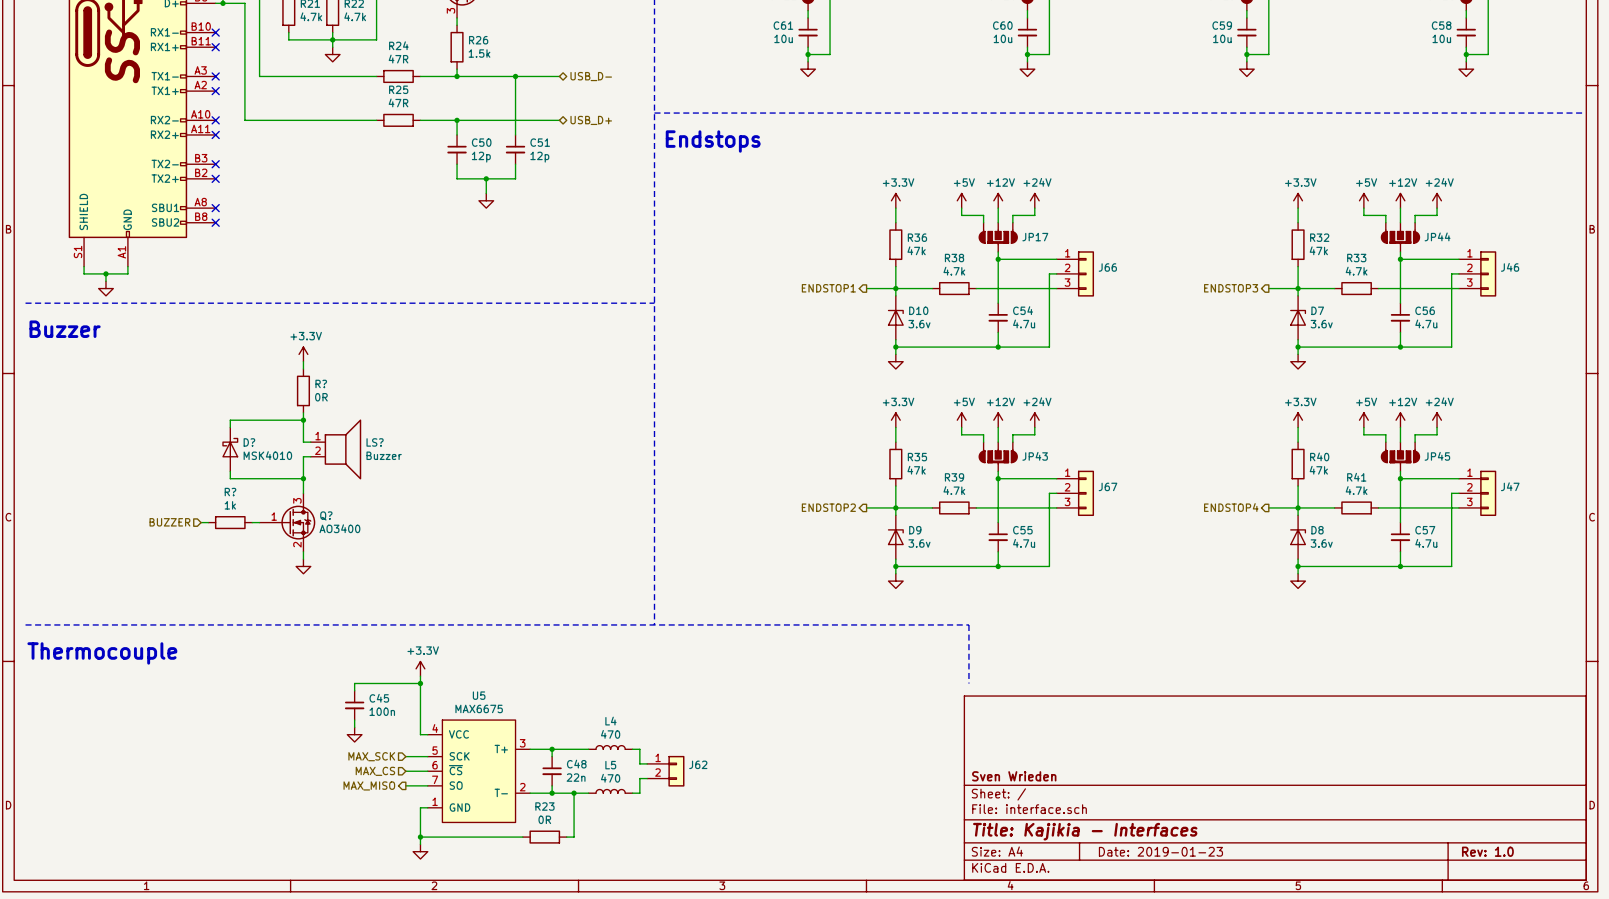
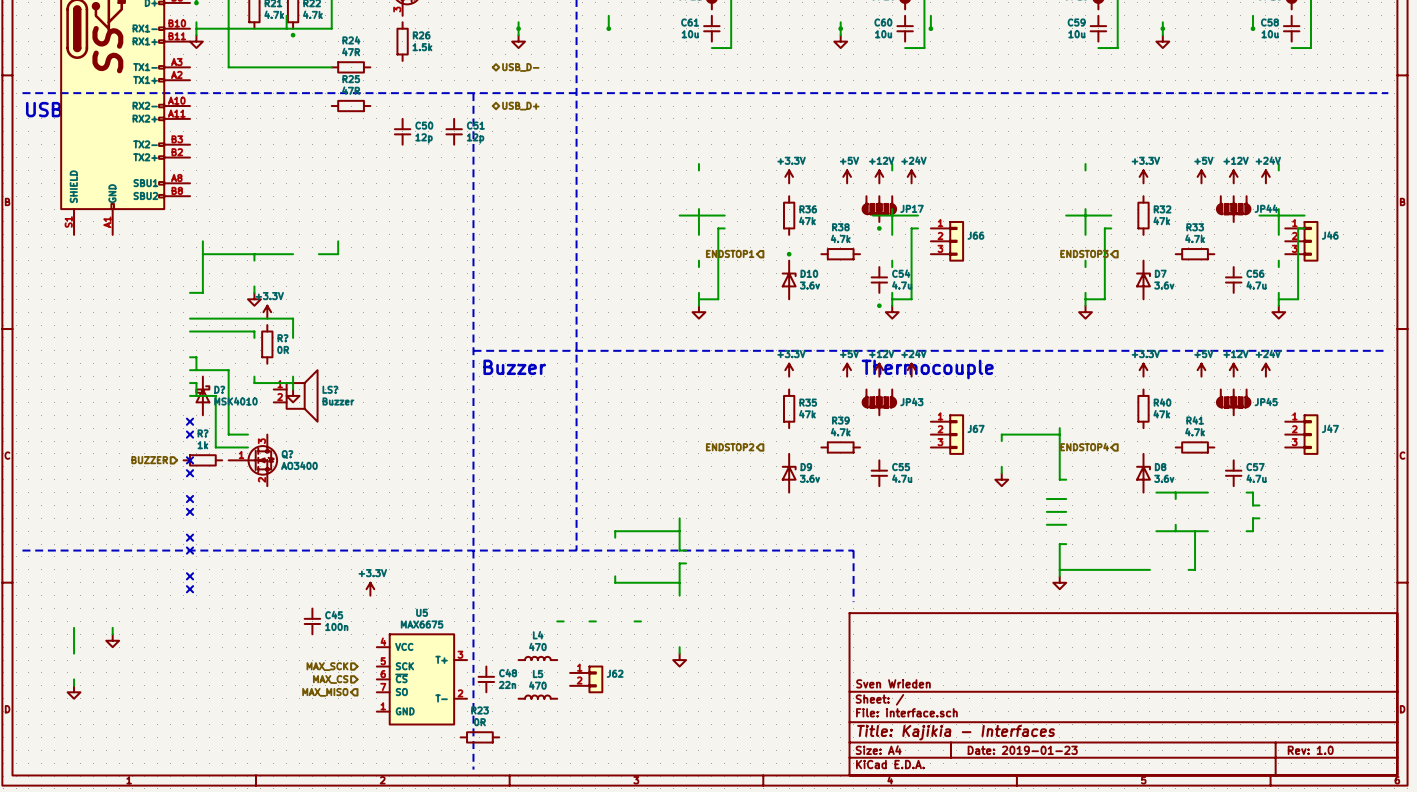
wire: (215, 3) (244, 3) (244, 120) (376, 120) -> none
wire: (808, 10) (808, 17) -> none
wire: (1027, 10) (1027, 17) -> none
wire: (1246, 10) (1246, 17) -> none
wire: (1466, 10) (1466, 17) -> none
wire: (457, 17) (457, 25) -> none
wire: none -> (196, 22) (196, 35)
wire: none -> (518, 22) (518, 35)
wire: none -> (840, 22) (840, 35)
no-connect mark: (215, 32) -> none
wire: (288, 32) (288, 39) (376, 39) (376, 32) -> (196, 28) (331, 28)
wire: (332, 32) (332, 47) -> (286, 15) (286, 28)
junction: none -> (518, 28)
junction: none -> (608, 28)
junction: none -> (840, 28)
junction: none -> (930, 28)
junction: none -> (1162, 28)
junction: none -> (1253, 28)
no-connect mark: (215, 47) -> none
power symbol: none -> (518, 41)
wire: (808, 47) (808, 61) -> (608, 15) (608, 28)
power symbol: none -> (840, 41)
wire: (1027, 47) (1027, 61) -> (930, 15) (930, 28)
wire: (1246, 47) (1246, 61) -> (1162, 22) (1162, 35)
power symbol: none -> (1162, 41)
wire: (1466, 47) (1466, 61) -> (1253, 15) (1253, 28)
power symbol position: (332, 54) -> (196, 41)
junction: (808, 54) -> none
junction: (1027, 54) -> none
junction: (1246, 54) -> none
junction: (1466, 54) -> none
wire: (457, 69) (457, 76) -> none
power symbol: (808, 69) -> none
power symbol: (1027, 69) -> none
power symbol: (1246, 69) -> none
power symbol: (1466, 69) -> none
no-connect mark: (215, 76) -> none
wire: (420, 76) (559, 76) -> none
junction: (457, 76) -> none
wire: (515, 76) (515, 134) -> none
junction: (515, 76) -> none
no-connect mark: (215, 91) -> none
line: none -> (22, 93) (1388, 93)
line: none -> (473, 93) (473, 769)
line: (654, 113) (1583, 113) -> none
no-connect mark: (215, 120) -> none
wire: (420, 120) (559, 120) -> none
wire: (457, 120) (457, 134) -> none
junction: (457, 120) -> none
text: none -> USB (43, 109)
no-connect mark: (215, 134) -> none
text: Endstops (713, 141) -> none
no-connect mark: (215, 164) -> none
wire: (457, 164) (457, 178) (515, 178) (515, 164) -> none
no-connect mark: (215, 178) -> none
wire: (486, 178) (486, 193) -> none
junction: (486, 178) -> none
wire: none -> (698, 164) (698, 170)
wire: none -> (892, 164) (892, 170)
wire: none -> (1085, 164) (1085, 170)
wire: none -> (1278, 164) (1278, 170)
power symbol: (486, 200) -> none
no-connect mark: (215, 208) -> none
wire: (895, 208) (895, 222) -> none
wire: (961, 208) (961, 215) (983, 215) (983, 222) -> none
wire: (998, 208) (998, 222) -> none
wire: (1034, 208) (1034, 215) (1012, 215) (1012, 222) -> none
wire: (1298, 208) (1298, 222) -> none
wire: (1363, 208) (1363, 215) (1385, 215) (1385, 222) -> none
wire: (1400, 208) (1400, 222) -> none
wire: (1437, 208) (1437, 215) (1415, 215) (1415, 222) -> none
no-connect mark: (215, 222) -> none
wire: none -> (892, 209) (892, 234)
wire: none -> (679, 215) (724, 215)
wire: none -> (872, 215) (918, 215)
wire: none -> (1066, 215) (1111, 215)
wire: none -> (1259, 215) (1304, 215)
wire: (998, 251) (998, 303) -> none
wire: (1400, 251) (1400, 303) -> none
wire: none -> (724, 228) (718, 228) (718, 299) (698, 299)
wire: (998, 259) (1034, 259) -> (892, 299) (911, 299) (911, 228)
wire: (1042, 259) (1056, 259) -> none
wire: none -> (1111, 228) (1104, 228) (1104, 299) (1085, 299)
wire: (1400, 259) (1458, 259) -> none
junction: (1400, 259) -> none
wire: none -> (1304, 228) (1298, 228) (1298, 299) (1278, 299)
wire: (84, 266) (84, 273) (127, 273) (127, 266) -> none
wire: (895, 266) (895, 295) -> (698, 209) (698, 234)
wire: (1298, 266) (1298, 295) -> (1085, 209) (1085, 234)
wire: (105, 273) (105, 281) -> none
junction: (105, 273) -> none
wire: none -> (202, 241) (202, 292) (190, 292)
wire: none -> (338, 241) (338, 254) (318, 254)
wire: (1056, 273) (1049, 273) (1049, 347) (895, 347) -> none
wire: (1458, 273) (1451, 273) (1451, 295) -> none
power symbol: (105, 288) -> none
wire: none -> (202, 254) (293, 254)
wire: none -> (254, 254) (254, 260)
wire: (866, 288) (932, 288) -> none
wire: (976, 288) (1056, 288) -> none
wire: (1268, 288) (1334, 288) -> none
junction: (1298, 288) -> none
wire: (1378, 288) (1458, 288) -> none
wire: none -> (698, 260) (698, 267)
wire: none -> (892, 260) (892, 267)
wire: none -> (1085, 260) (1085, 267)
line: (25, 303) (654, 303) -> none
wire: (1451, 303) (1451, 332) -> (1278, 209) (1278, 234)
text: Buzzer (65, 329) -> none
wire: (998, 332) (998, 347) -> (892, 292) (892, 305)
wire: (1400, 332) (1400, 347) -> none
power symbol: none -> (254, 299)
wire: (895, 339) (895, 354) -> (698, 292) (698, 305)
wire: (1298, 339) (1298, 354) -> (1085, 292) (1085, 305)
junction: (895, 347) -> none
wire: (1298, 347) (1451, 347) -> none
junction: (1298, 347) -> none
junction: (1400, 347) -> none
power symbol: none -> (698, 312)
power symbol: none -> (892, 312)
power symbol: none -> (1278, 312)
wire: none -> (190, 318) (293, 318) (293, 337)
wire: (303, 361) (303, 369) -> (254, 286) (254, 292)
power symbol: (895, 361) -> none
power symbol position: (1298, 361) -> (1085, 312)
wire: none -> (190, 331) (254, 331) (254, 337)
line: none -> (473, 350) (1388, 350)
wire: none -> (190, 357) (196, 357) (196, 370)
wire: (303, 412) (303, 442) (310, 442) -> none
text: none -> Buzzer (514, 367)
text: none -> Thermocouple (927, 369)
wire: (230, 420) (230, 427) -> (202, 370) (190, 370)
wire: (259, 420) (303, 420) -> (228, 370) (228, 434) (247, 434)
junction: (303, 420) -> none
wire: none -> (254, 376) (254, 383) (293, 383)
wire: none -> (293, 376) (293, 389)
wire: (895, 427) (895, 442) -> none
wire: (961, 427) (961, 434) (983, 434) (983, 442) -> none
wire: (998, 427) (998, 442) -> none
wire: (1034, 427) (1034, 434) (1012, 434) (1012, 442) -> none
wire: (1298, 427) (1298, 442) -> none
wire: (1363, 427) (1363, 434) (1385, 434) (1385, 442) -> none
wire: (1400, 427) (1400, 442) -> none
wire: (1437, 427) (1437, 434) (1415, 434) (1415, 442) -> none
wire: none -> (190, 383) (196, 383) (196, 395)
wire: none -> (190, 395) (215, 395) (215, 447) (247, 447)
power symbol: none -> (293, 395)
wire: (310, 456) (303, 456) (303, 493) -> none
wire: (230, 471) (230, 478) (303, 478) -> none
wire: (998, 471) (998, 522) -> none
wire: (1400, 471) (1400, 522) -> none
no-connect mark: none -> (190, 421)
junction: (303, 478) -> none
wire: (998, 478) (1056, 478) -> none
junction: (998, 478) -> none
wire: (1400, 478) (1458, 478) -> (1156, 492) (1207, 492)
junction: (1400, 478) -> none
wire: (895, 486) (895, 515) -> none
wire: none -> (1059, 428) (1059, 479) (1066, 479)
wire: (1298, 486) (1298, 515) -> none
no-connect mark: none -> (190, 434)
wire: (1056, 493) (1049, 493) (1049, 566) (895, 566) -> none
wire: none -> (1059, 434) (1001, 434) (1001, 441)
wire: (1458, 493) (1451, 493) (1451, 566) (1298, 566) -> none
wire: (866, 507) (932, 507) -> none
junction: (895, 507) -> none
wire: (976, 507) (1056, 507) -> none
wire: (1268, 507) (1334, 507) -> none
junction: (1298, 507) -> none
wire: (1378, 507) (1458, 507) -> none
wire: (201, 522) (208, 522) -> none
no-connect mark: none -> (190, 460)
wire: (252, 522) (259, 522) -> none
wire: none -> (1001, 466) (1001, 473)
no-connect mark: none -> (190, 473)
power symbol: none -> (1001, 479)
wire: (303, 551) (303, 559) -> none
wire: (998, 551) (998, 566) -> none
wire: (1400, 551) (1400, 566) -> none
wire: (895, 559) (895, 573) -> none
wire: (1298, 559) (1298, 573) -> none
wire: none -> (1175, 492) (1175, 499)
wire: none -> (1246, 492) (1253, 492) (1253, 505) (1259, 505)
no-connect mark: none -> (190, 499)
power symbol: (303, 566) -> none
junction: (895, 566) -> none
junction: (998, 566) -> none
wire: none -> (1046, 499) (1066, 499)
junction: (1298, 566) -> none
junction: (1400, 566) -> none
no-connect mark: none -> (190, 511)
power symbol: (895, 581) -> none
wire: none -> (1046, 511) (1066, 511)
power symbol: (1298, 581) -> none
wire: none -> (679, 518) (679, 550) (686, 550)
wire: none -> (1259, 518) (1253, 518) (1253, 531) (1246, 531)
wire: none -> (1046, 524) (1066, 524)
wire: none -> (1175, 524) (1175, 531)
wire: none -> (679, 531) (615, 531) (615, 537)
wire: none -> (1156, 531) (1207, 531)
wire: none -> (1195, 531) (1195, 569) (1188, 569)
no-connect mark: none -> (190, 537)
wire: none -> (1066, 544) (1059, 544) (1059, 576)
no-connect mark: none -> (190, 550)
wire: none -> (686, 563) (679, 563) (679, 595)
wire: none -> (1059, 569) (1149, 569)
text: Thermocouple (102, 653) -> none
no-connect mark: none -> (190, 576)
wire: none -> (615, 576) (615, 582) (679, 582)
power symbol: none -> (1059, 582)
no-connect mark: none -> (190, 589)
wire: (420, 676) (420, 734) (427, 734) -> none
wire: (420, 683) (354, 683) (354, 690) -> none
junction: (420, 683) -> none
wire: none -> (557, 621) (563, 621)
wire: none -> (589, 621) (595, 621)
wire: none -> (634, 621) (640, 621)
wire: none -> (74, 627) (74, 653)
wire: none -> (112, 627) (112, 634)
wire: (354, 720) (354, 727) -> none
power symbol: none -> (112, 640)
power symbol: (354, 734) -> none
wire: none -> (679, 647) (679, 653)
wire: (530, 749) (588, 749) -> none
wire: (552, 749) (552, 756) -> none
junction: (552, 749) -> none
wire: (632, 749) (639, 749) (639, 763) (647, 763) -> none
power symbol: none -> (679, 660)
wire: (405, 756) (427, 756) -> none
wire: none -> (74, 679) (74, 685)
wire: (405, 771) (427, 771) -> none
wire: (647, 778) (639, 778) (639, 793) (632, 793) -> none
power symbol: none -> (74, 692)
wire: (405, 785) (427, 785) -> none
wire: (552, 785) (552, 793) -> none
wire: (530, 793) (588, 793) -> none
junction: (552, 793) -> none
wire: (574, 793) (574, 837) (566, 837) -> none
junction: (574, 793) -> none
wire: (427, 807) (420, 807) (420, 844) -> none
wire: (420, 837) (522, 837) -> none
junction: (420, 837) -> none
power symbol: (420, 851) -> none

